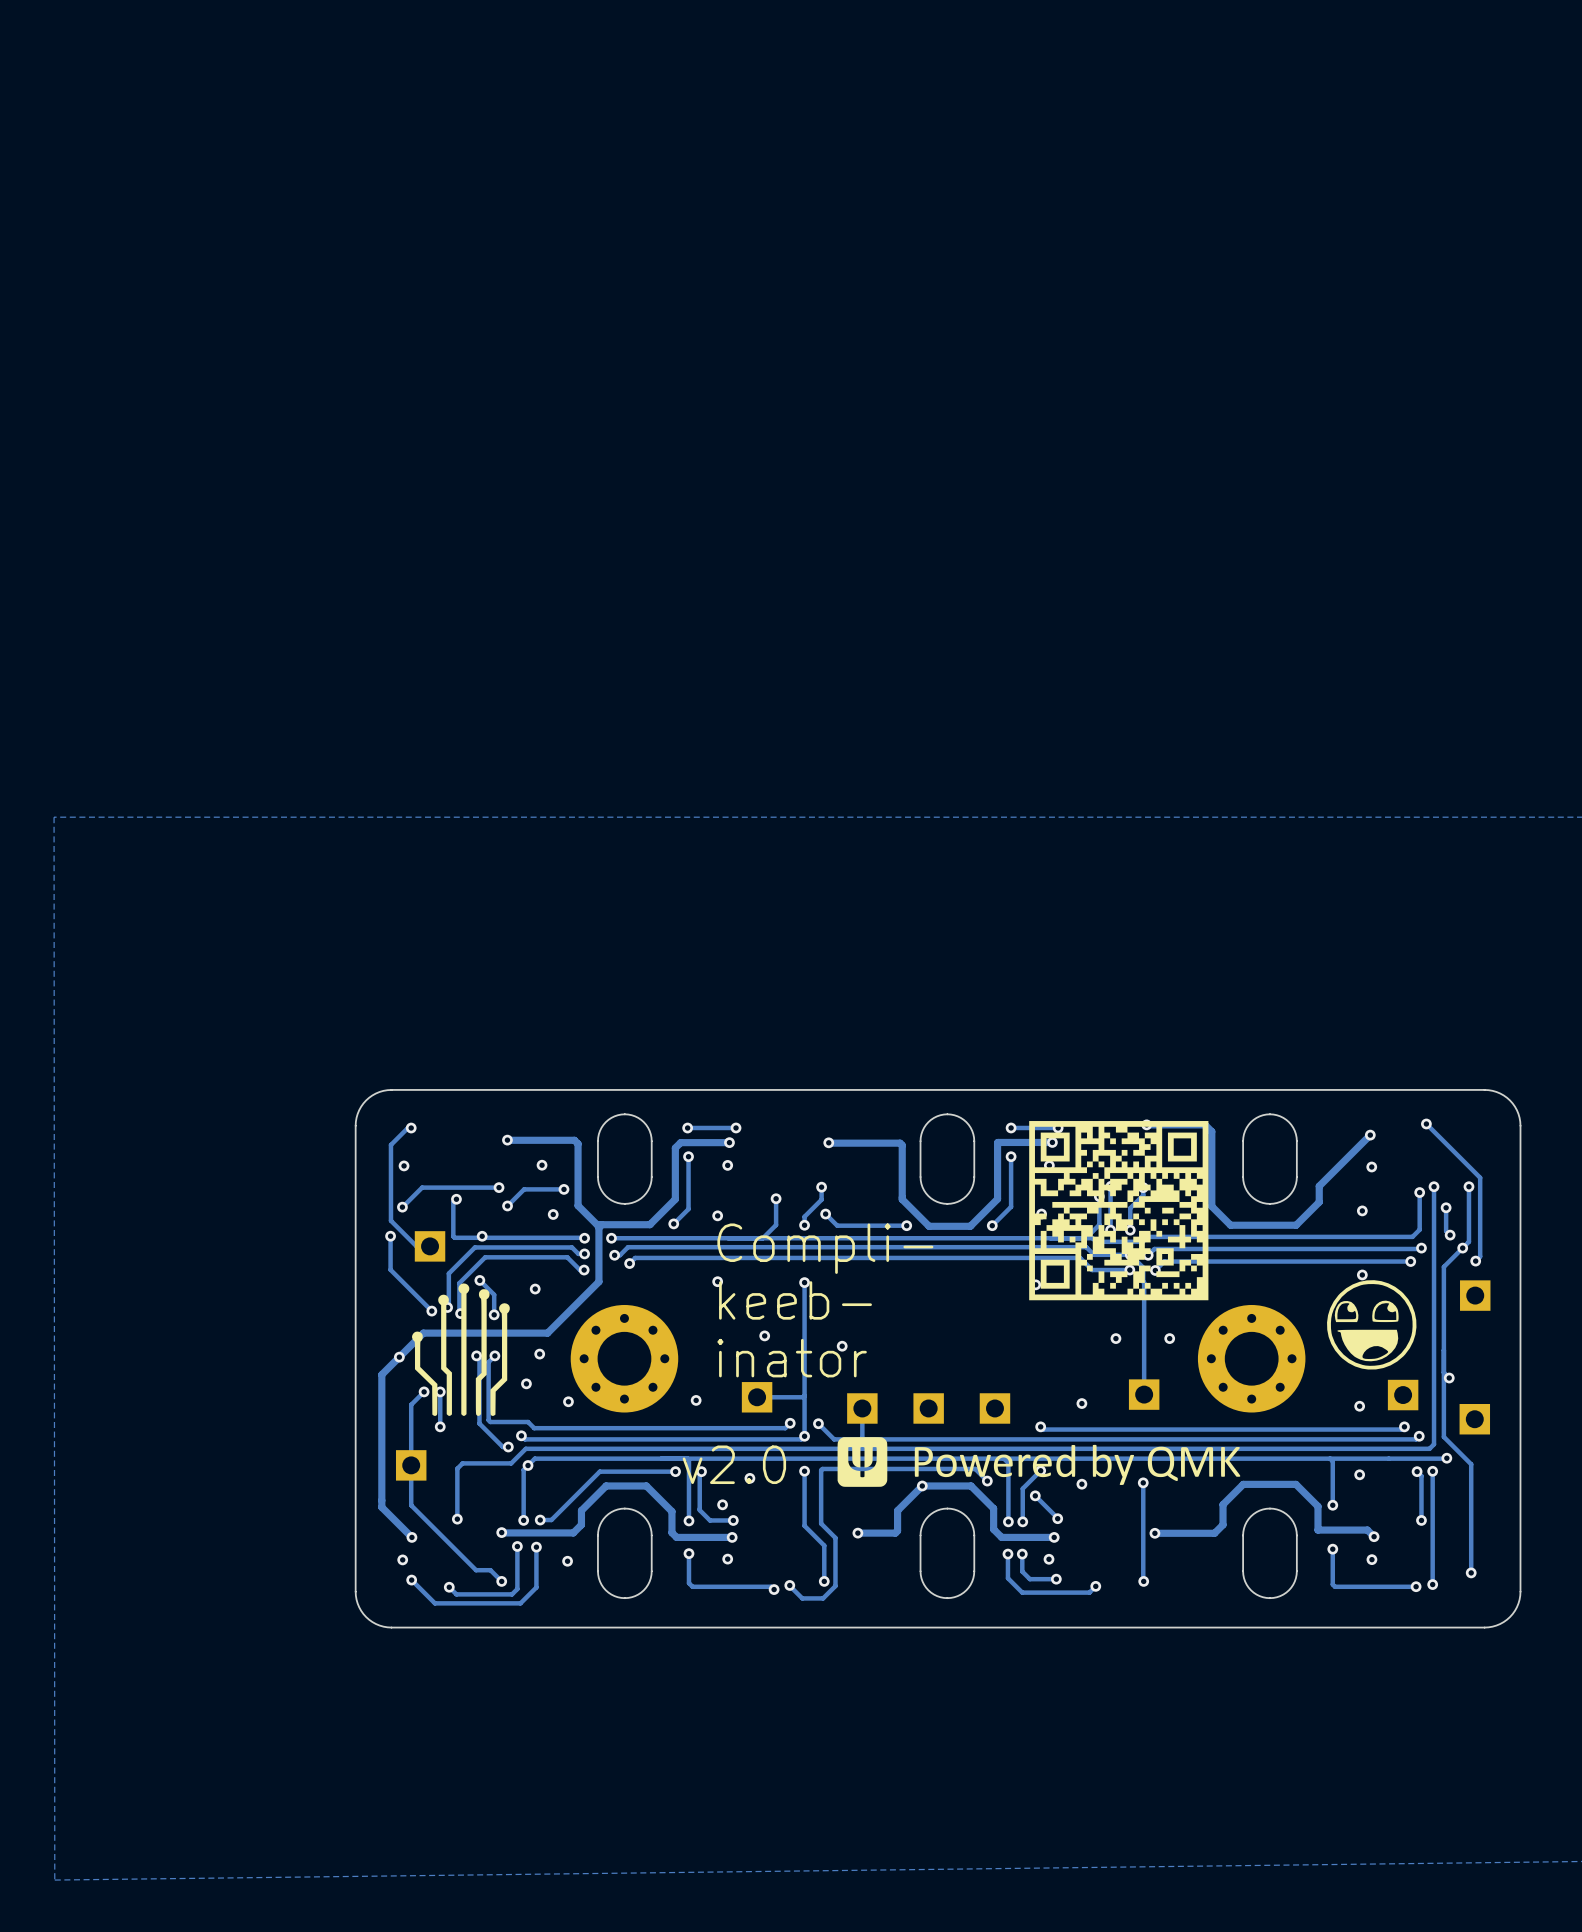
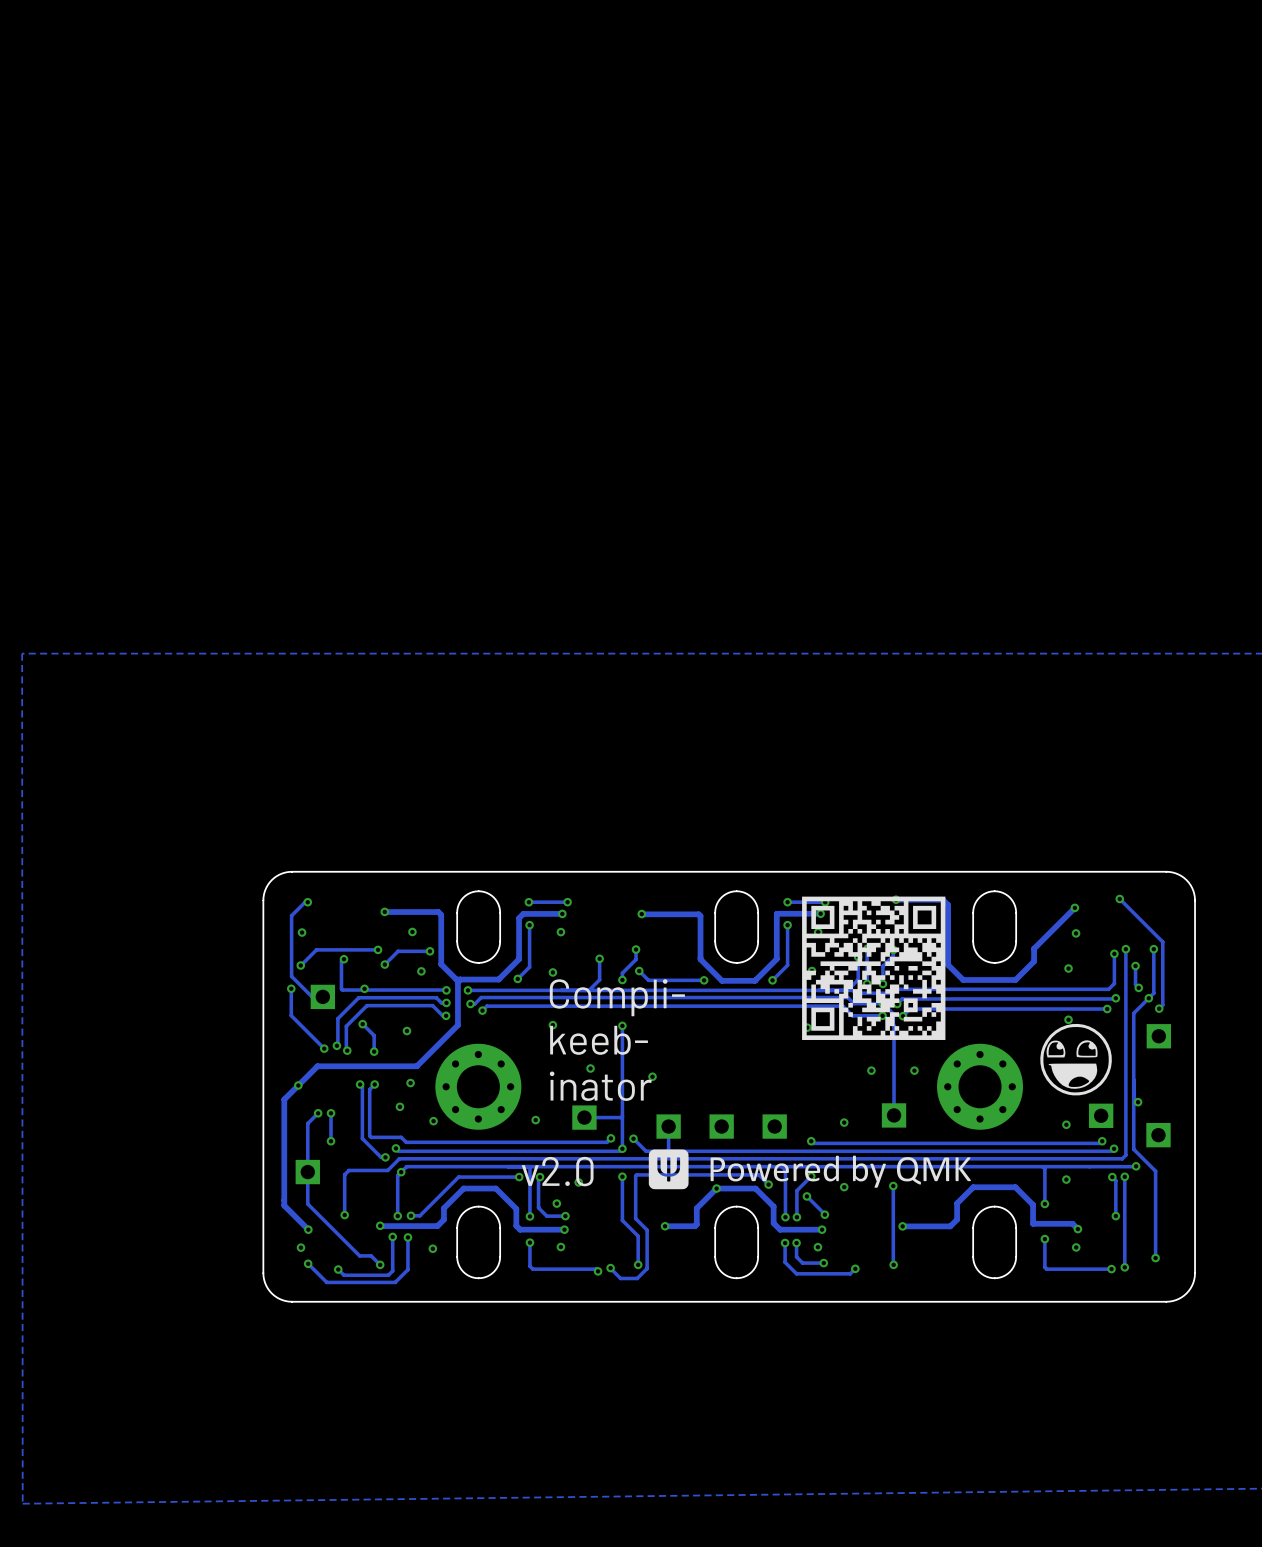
drawing: [412, 1283, 510, 1416] -> none

